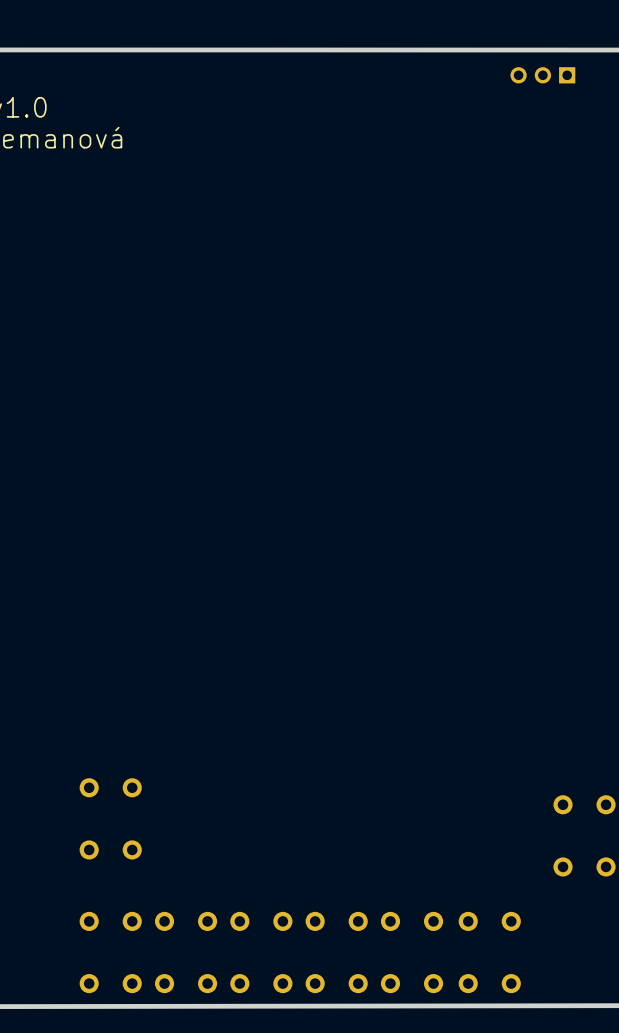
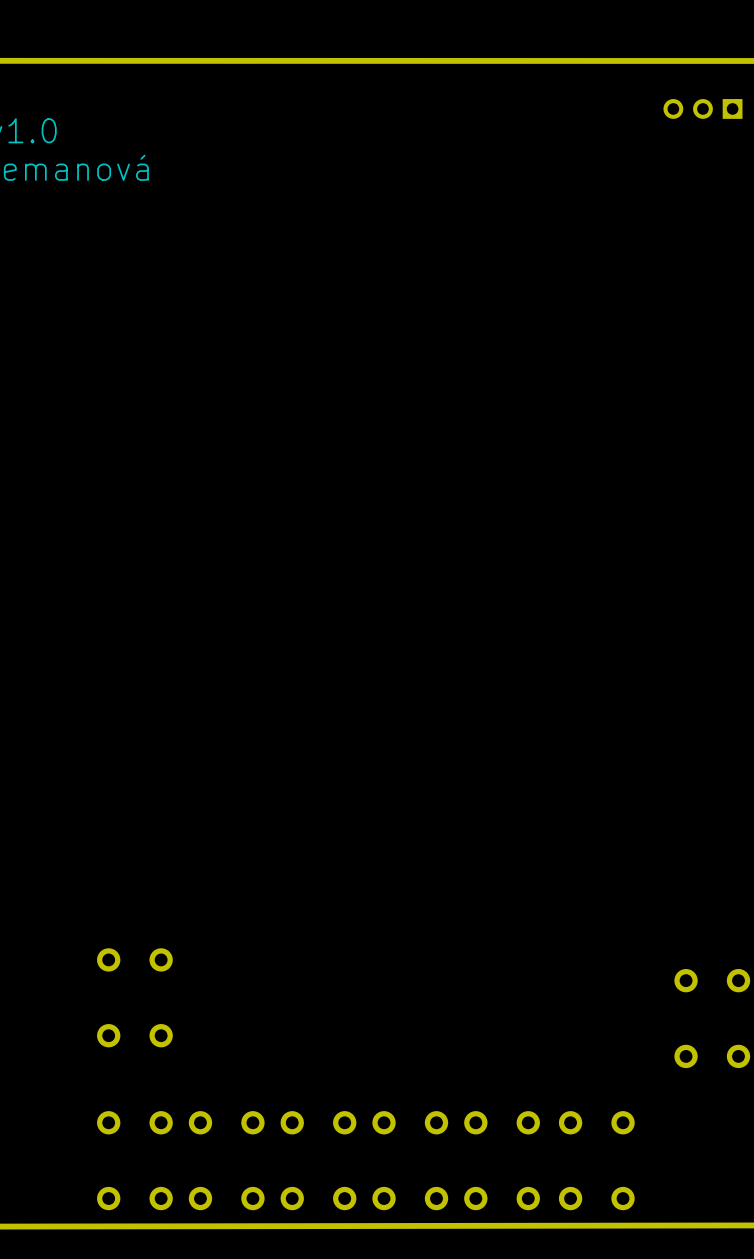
part position: (542, 75) -> (702, 108)

